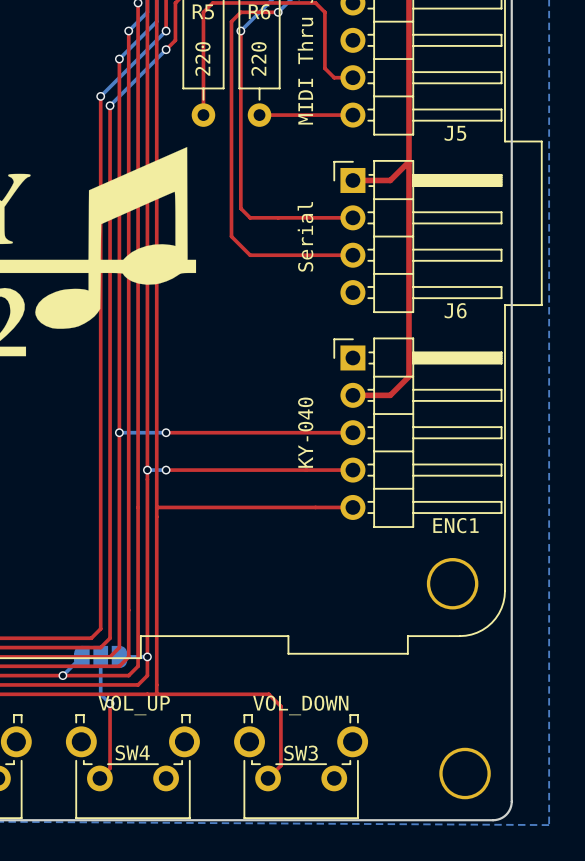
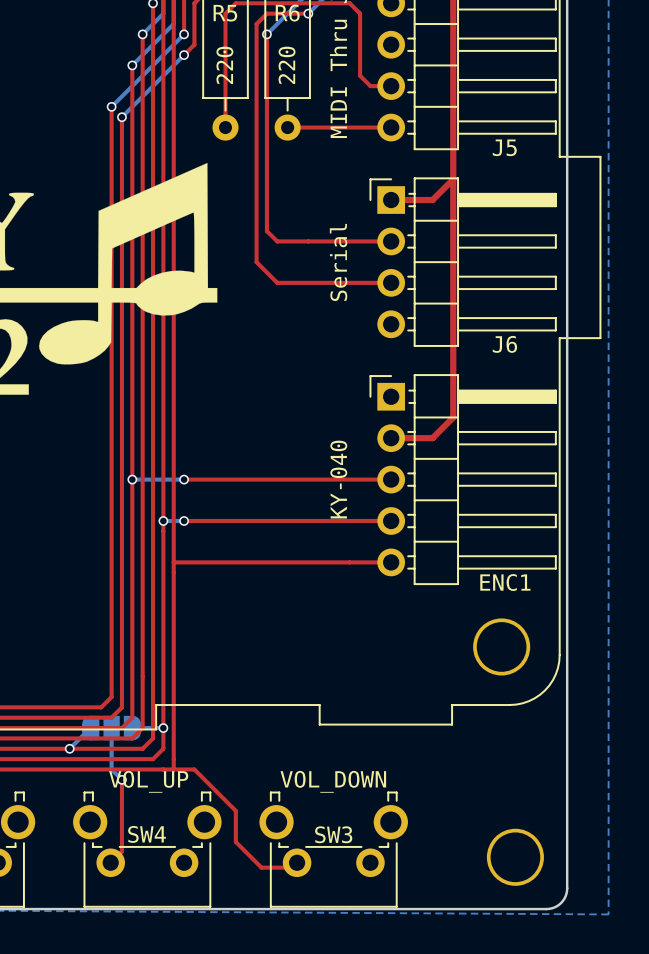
top track: (175, 694) (268, 694) (280, 706) (280, 765) (268, 778) -> (194, 769) (235, 810) (235, 841) (261, 867) (297, 867)

